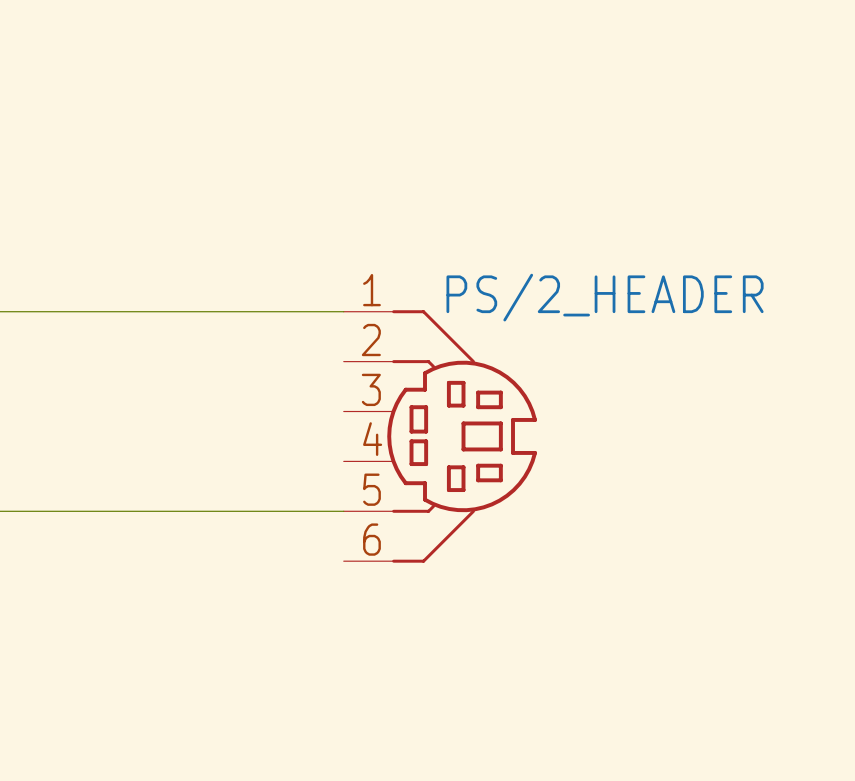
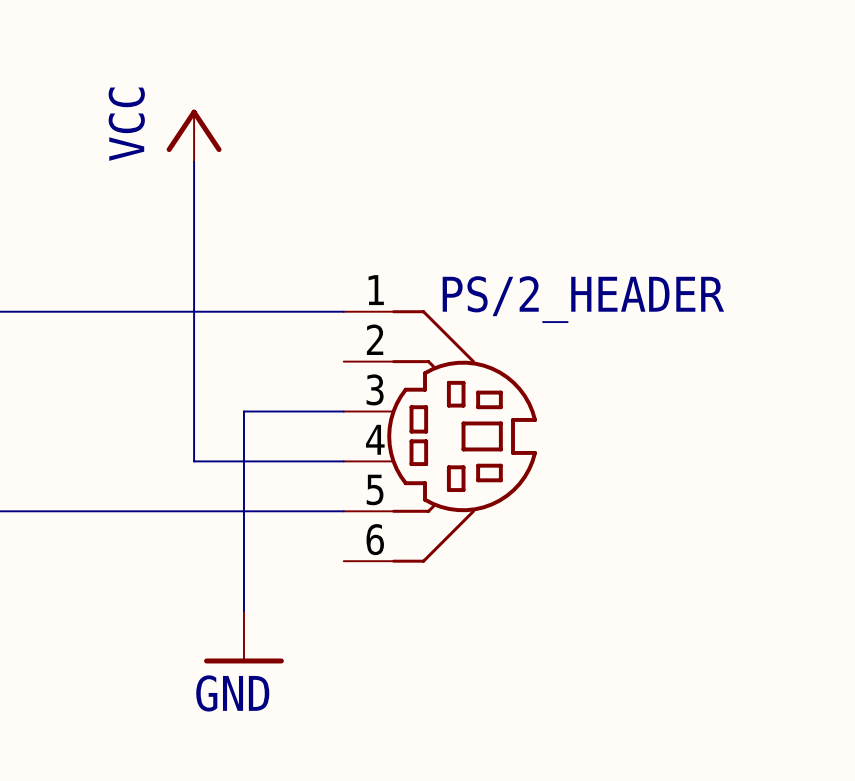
power symbol: none -> VCC (194, 135)
wire: none -> (194, 162) (194, 461) (343, 461)
wire: none -> (343, 411) (243, 411) (243, 611)
power symbol: none -> GND (243, 637)

